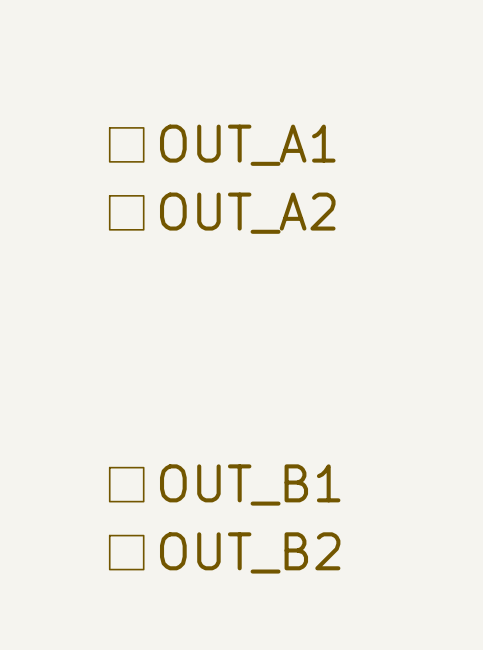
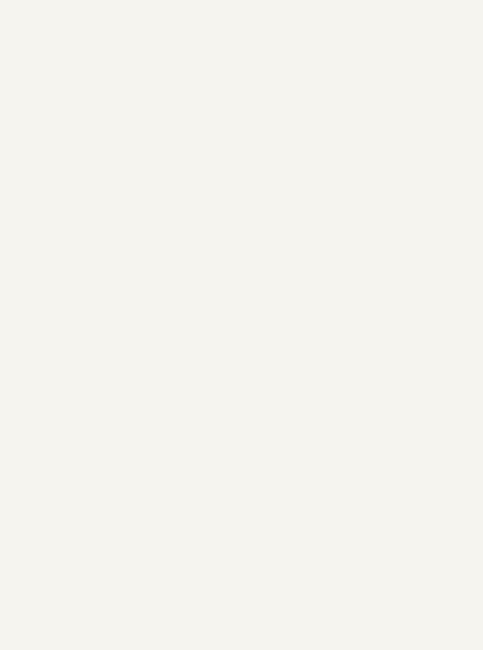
hierarchical label: OUT_A1 (247, 145) -> none
hierarchical label: OUT_A2 (247, 213) -> none
hierarchical label: OUT_B1 (250, 484) -> none
hierarchical label: OUT_B2 (250, 552) -> none

